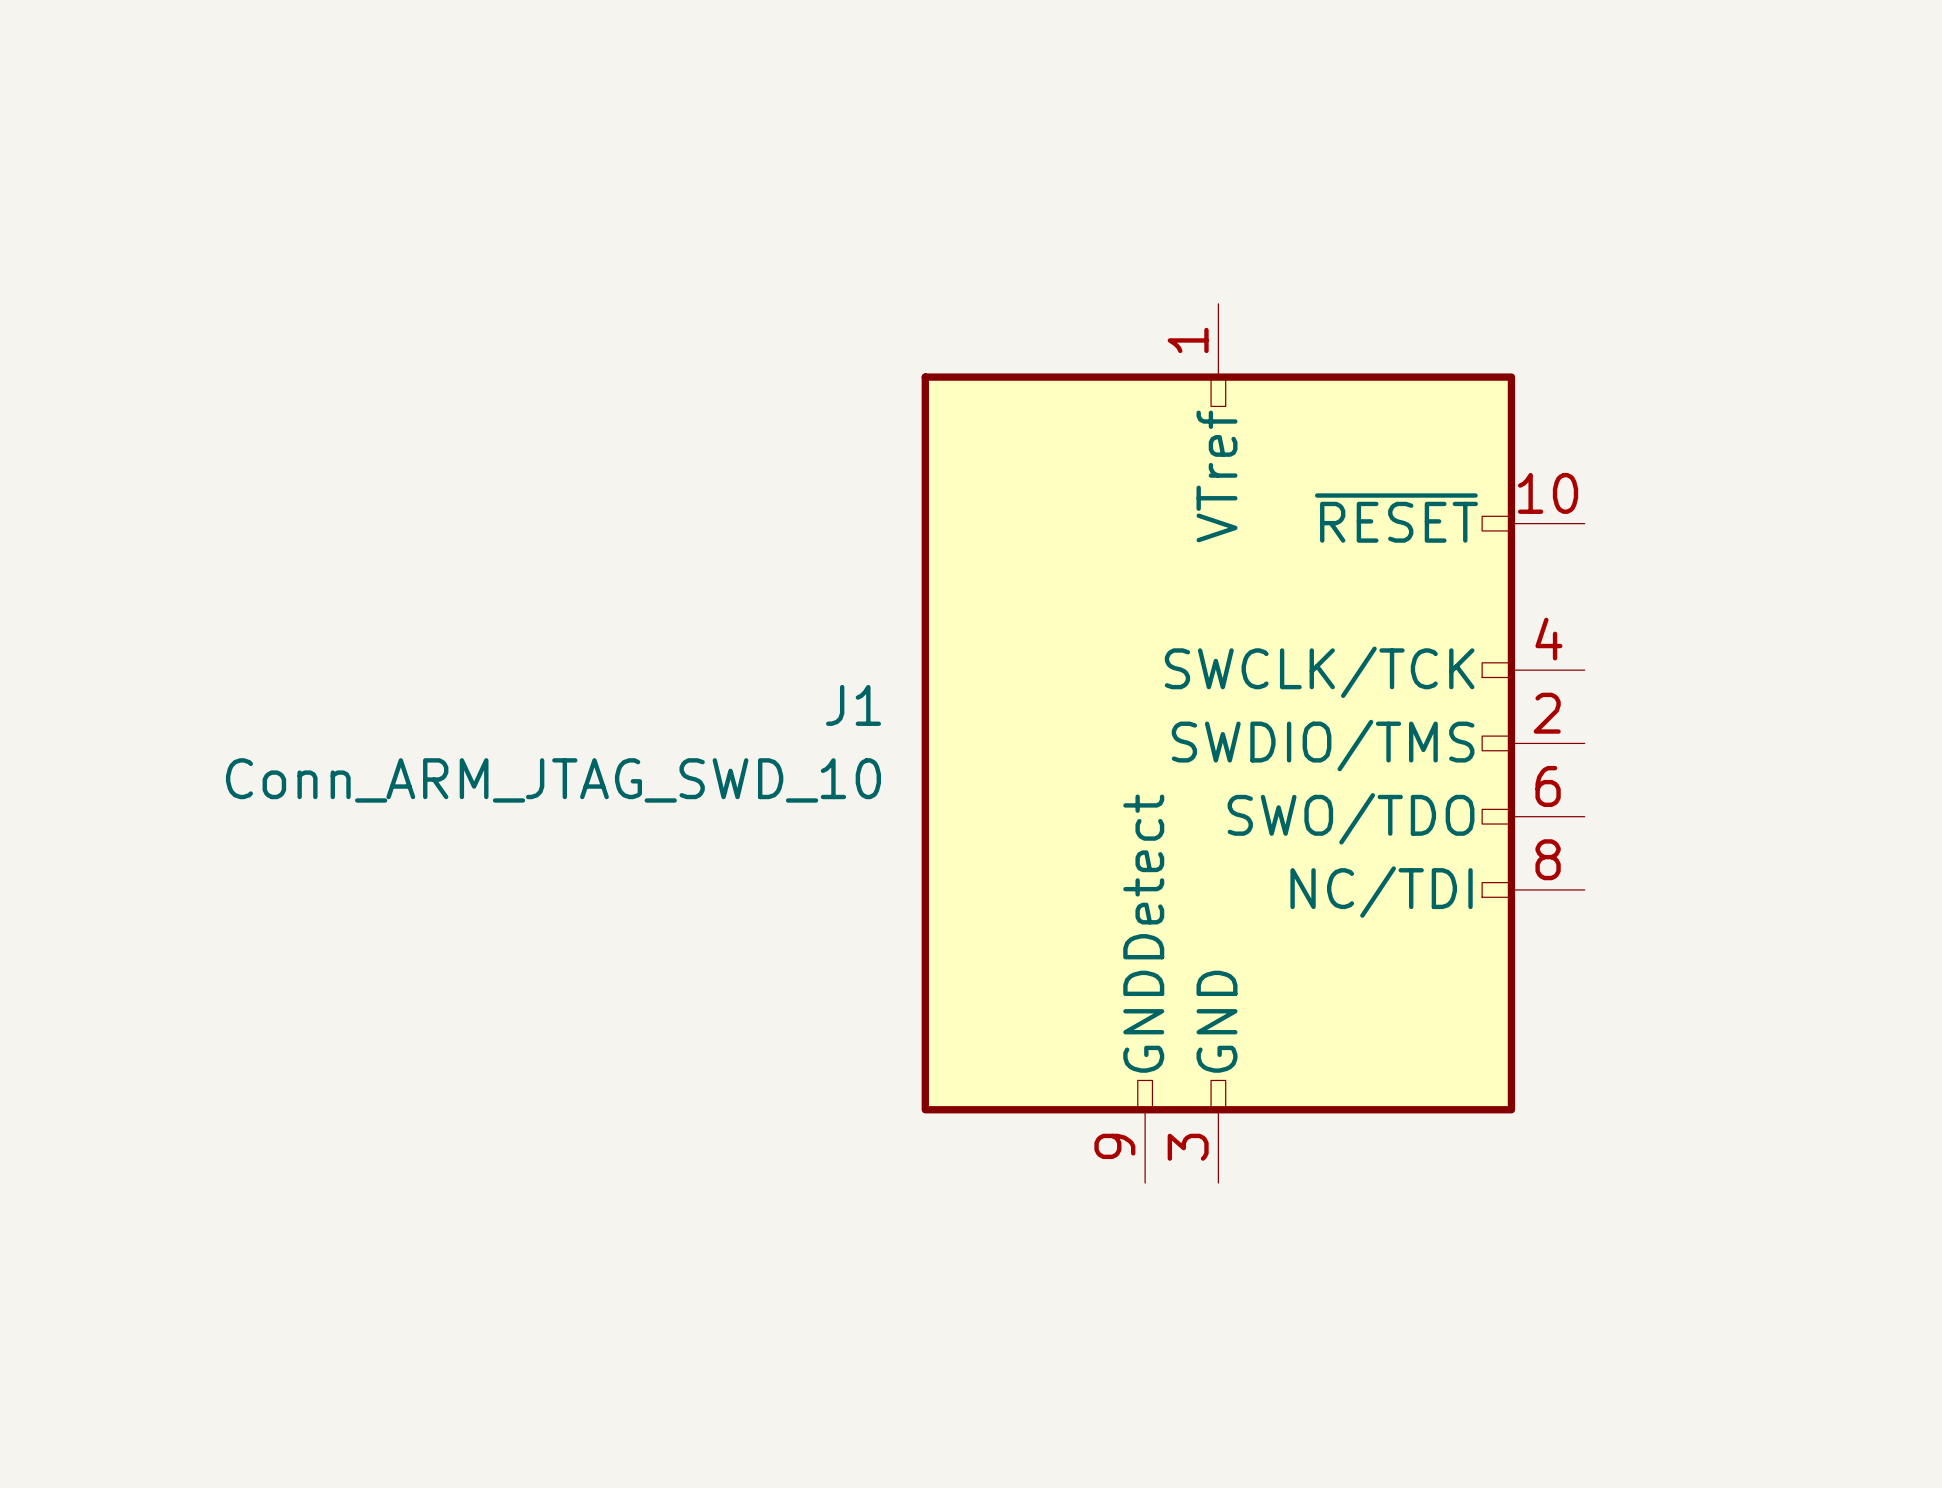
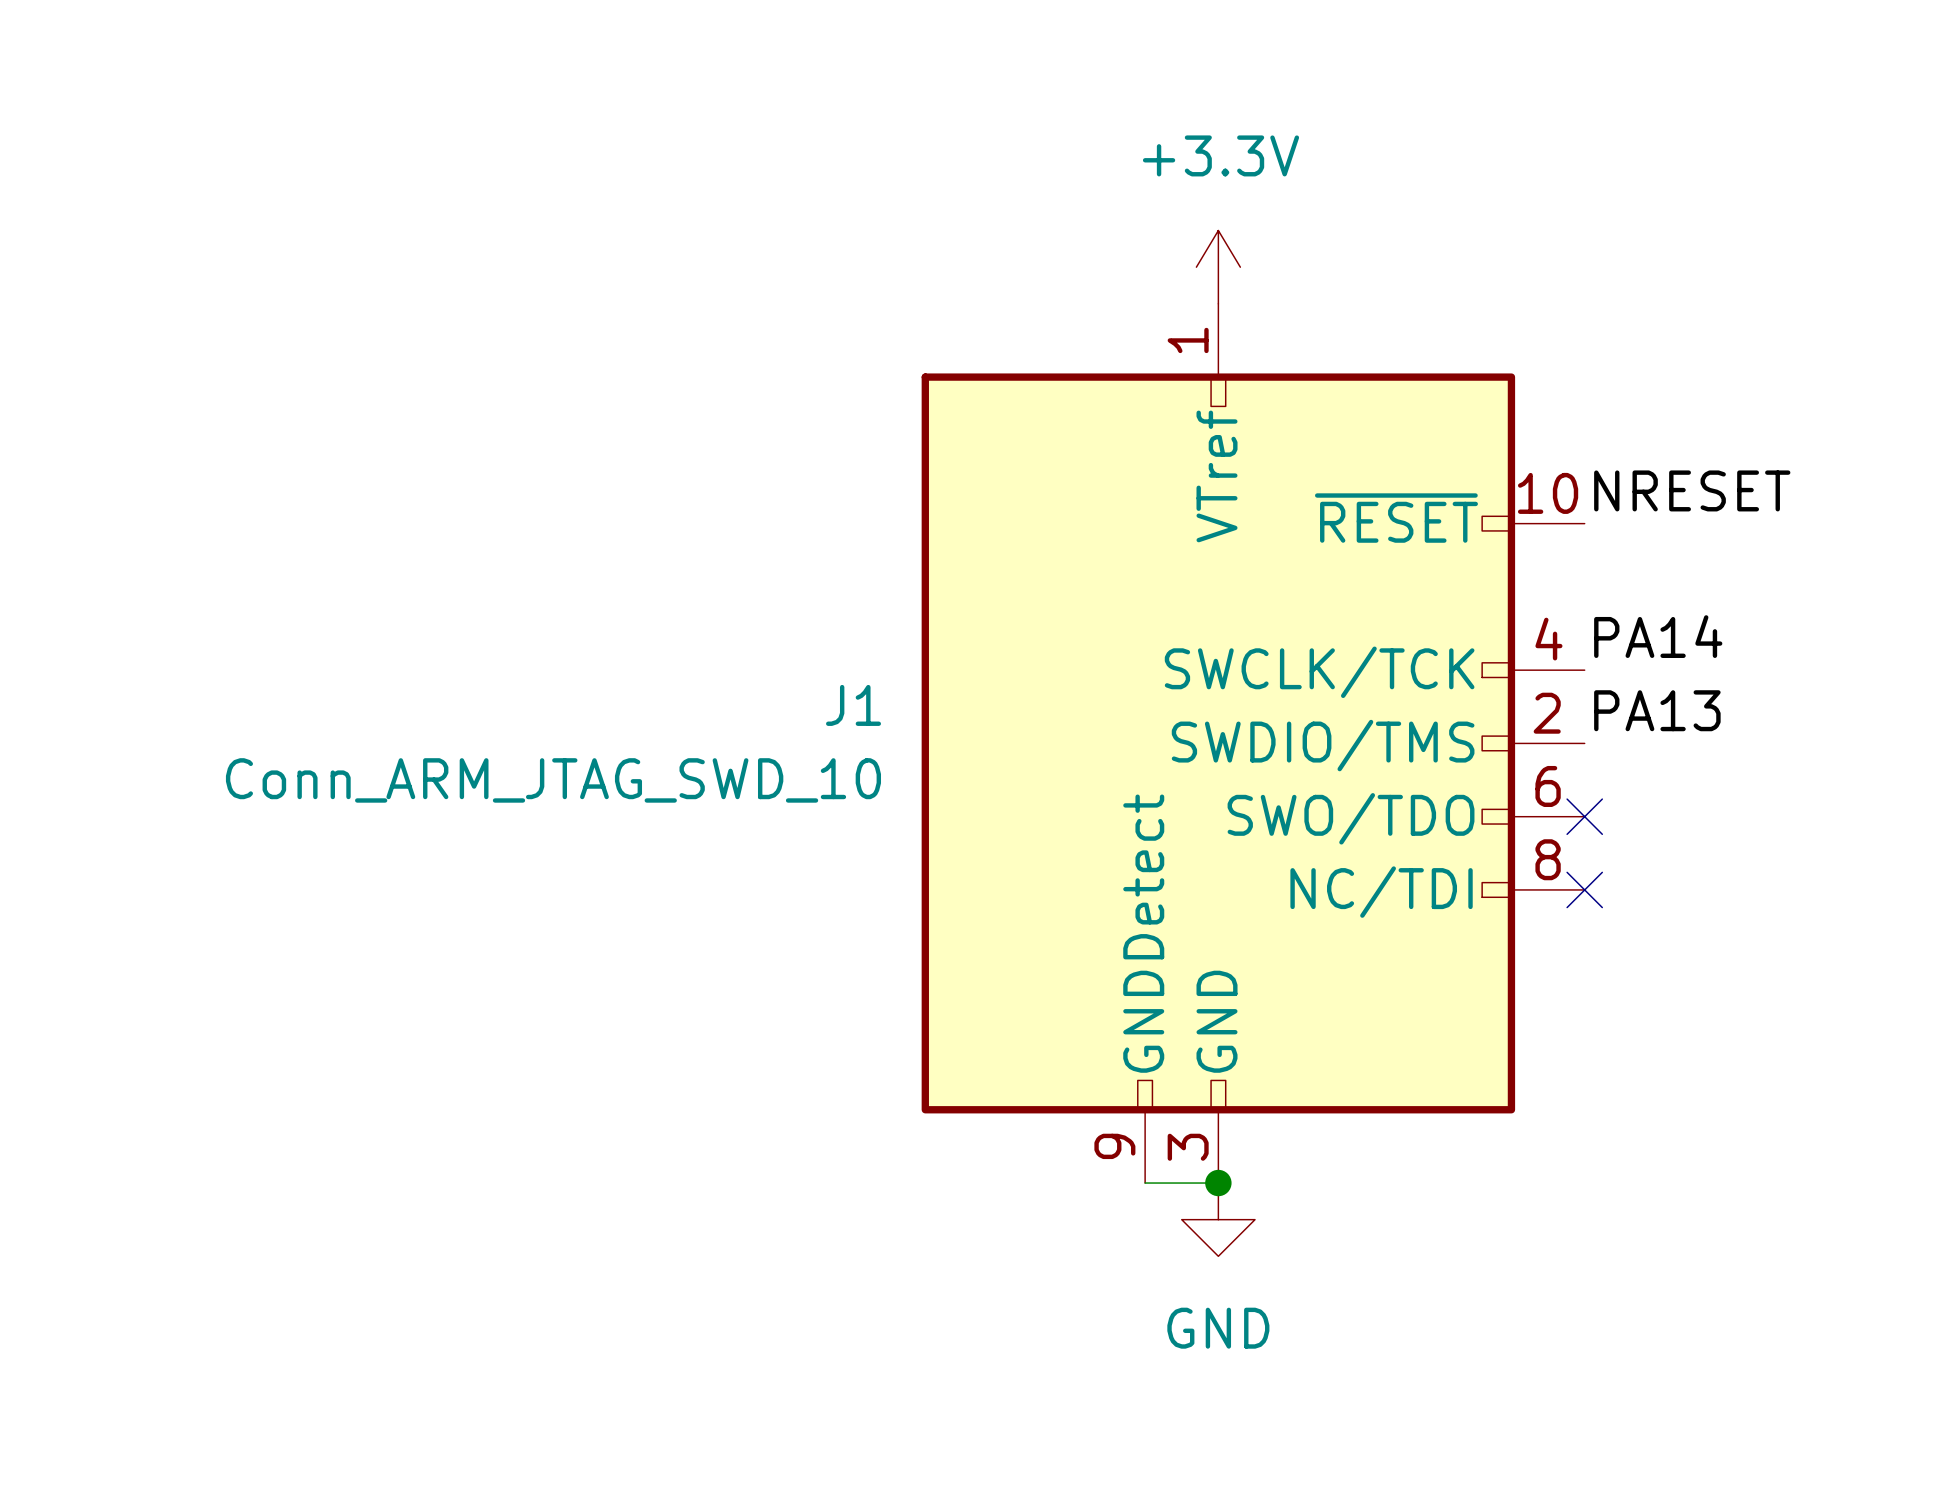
power symbol: none -> +3.3V (1218, 267)
label: none -> NRESET (1692, 490)
label: none -> PA14 (1658, 636)
label: none -> PA13 (1657, 710)
no-connect mark: none -> (1584, 816)
no-connect mark: none -> (1584, 889)
wire: none -> (1145, 1183) (1218, 1183)
junction: none -> (1218, 1183)
power symbol: none -> GND (1218, 1219)

